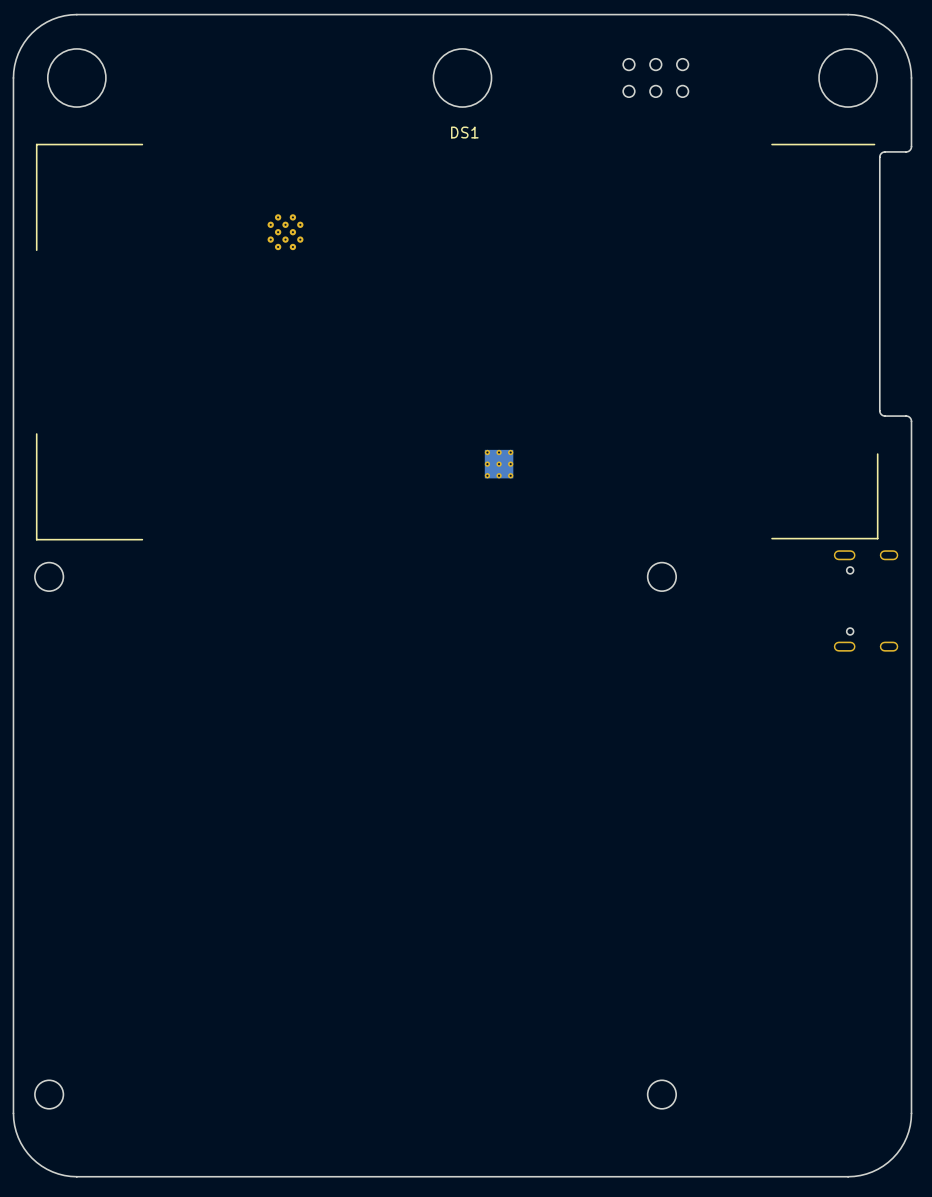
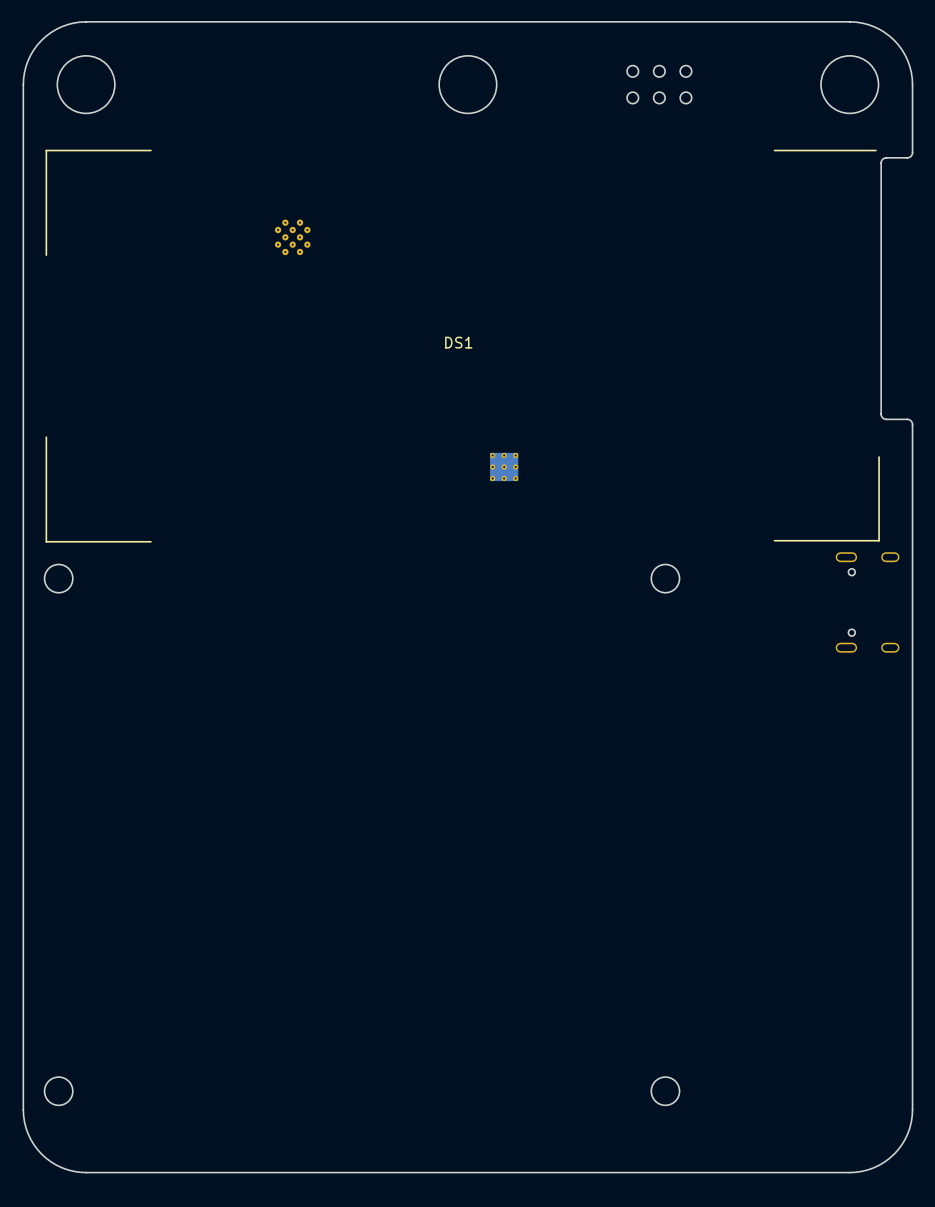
DS1 name position: DS1 (464, 132) -> DS1 (458, 342)

